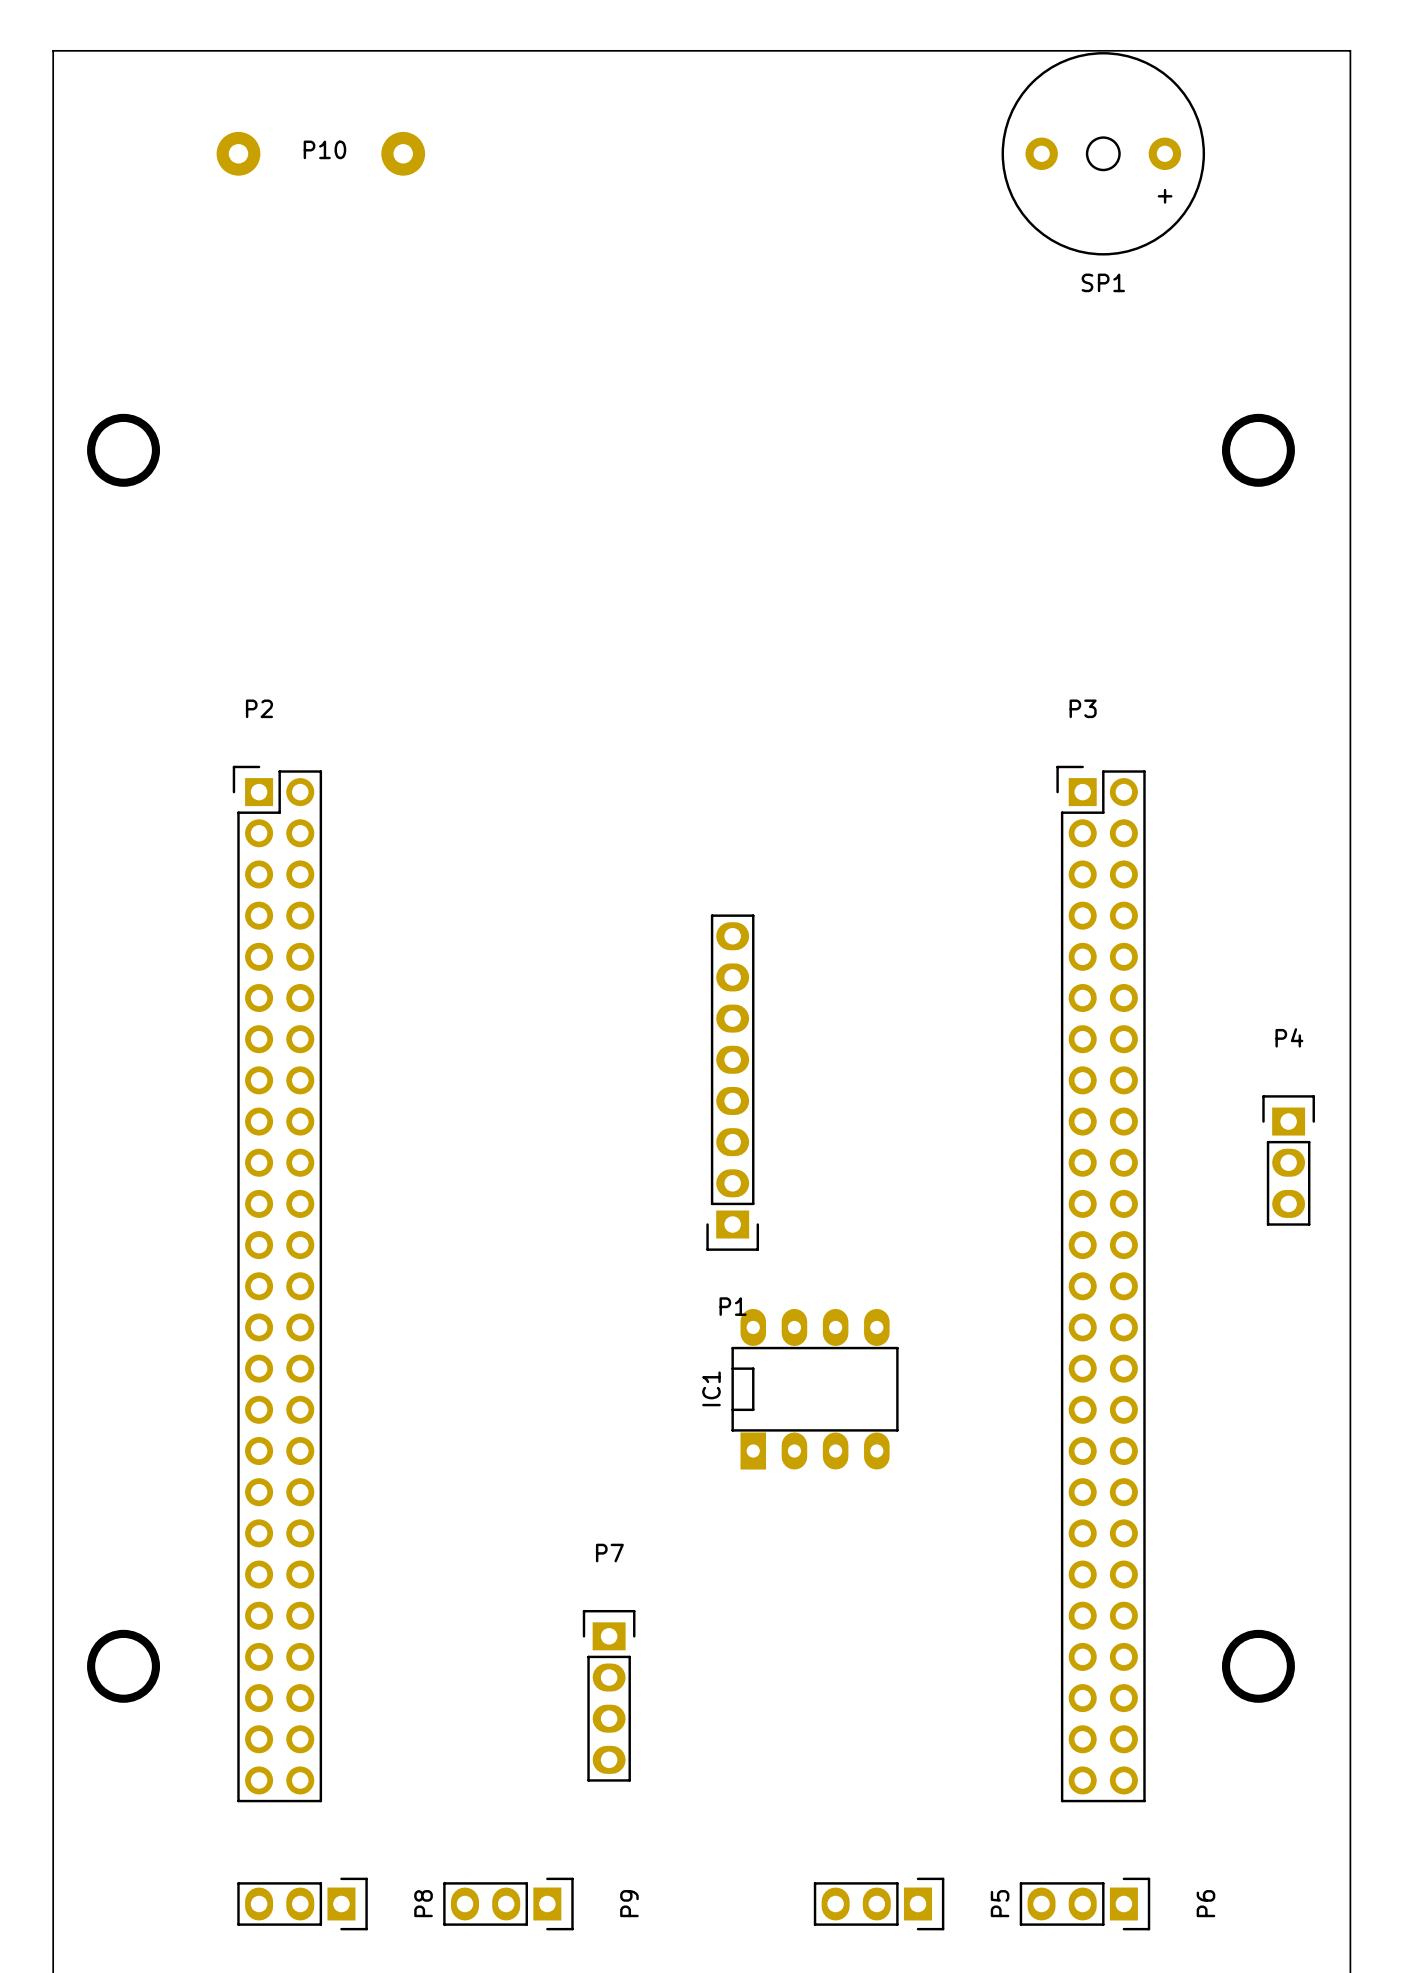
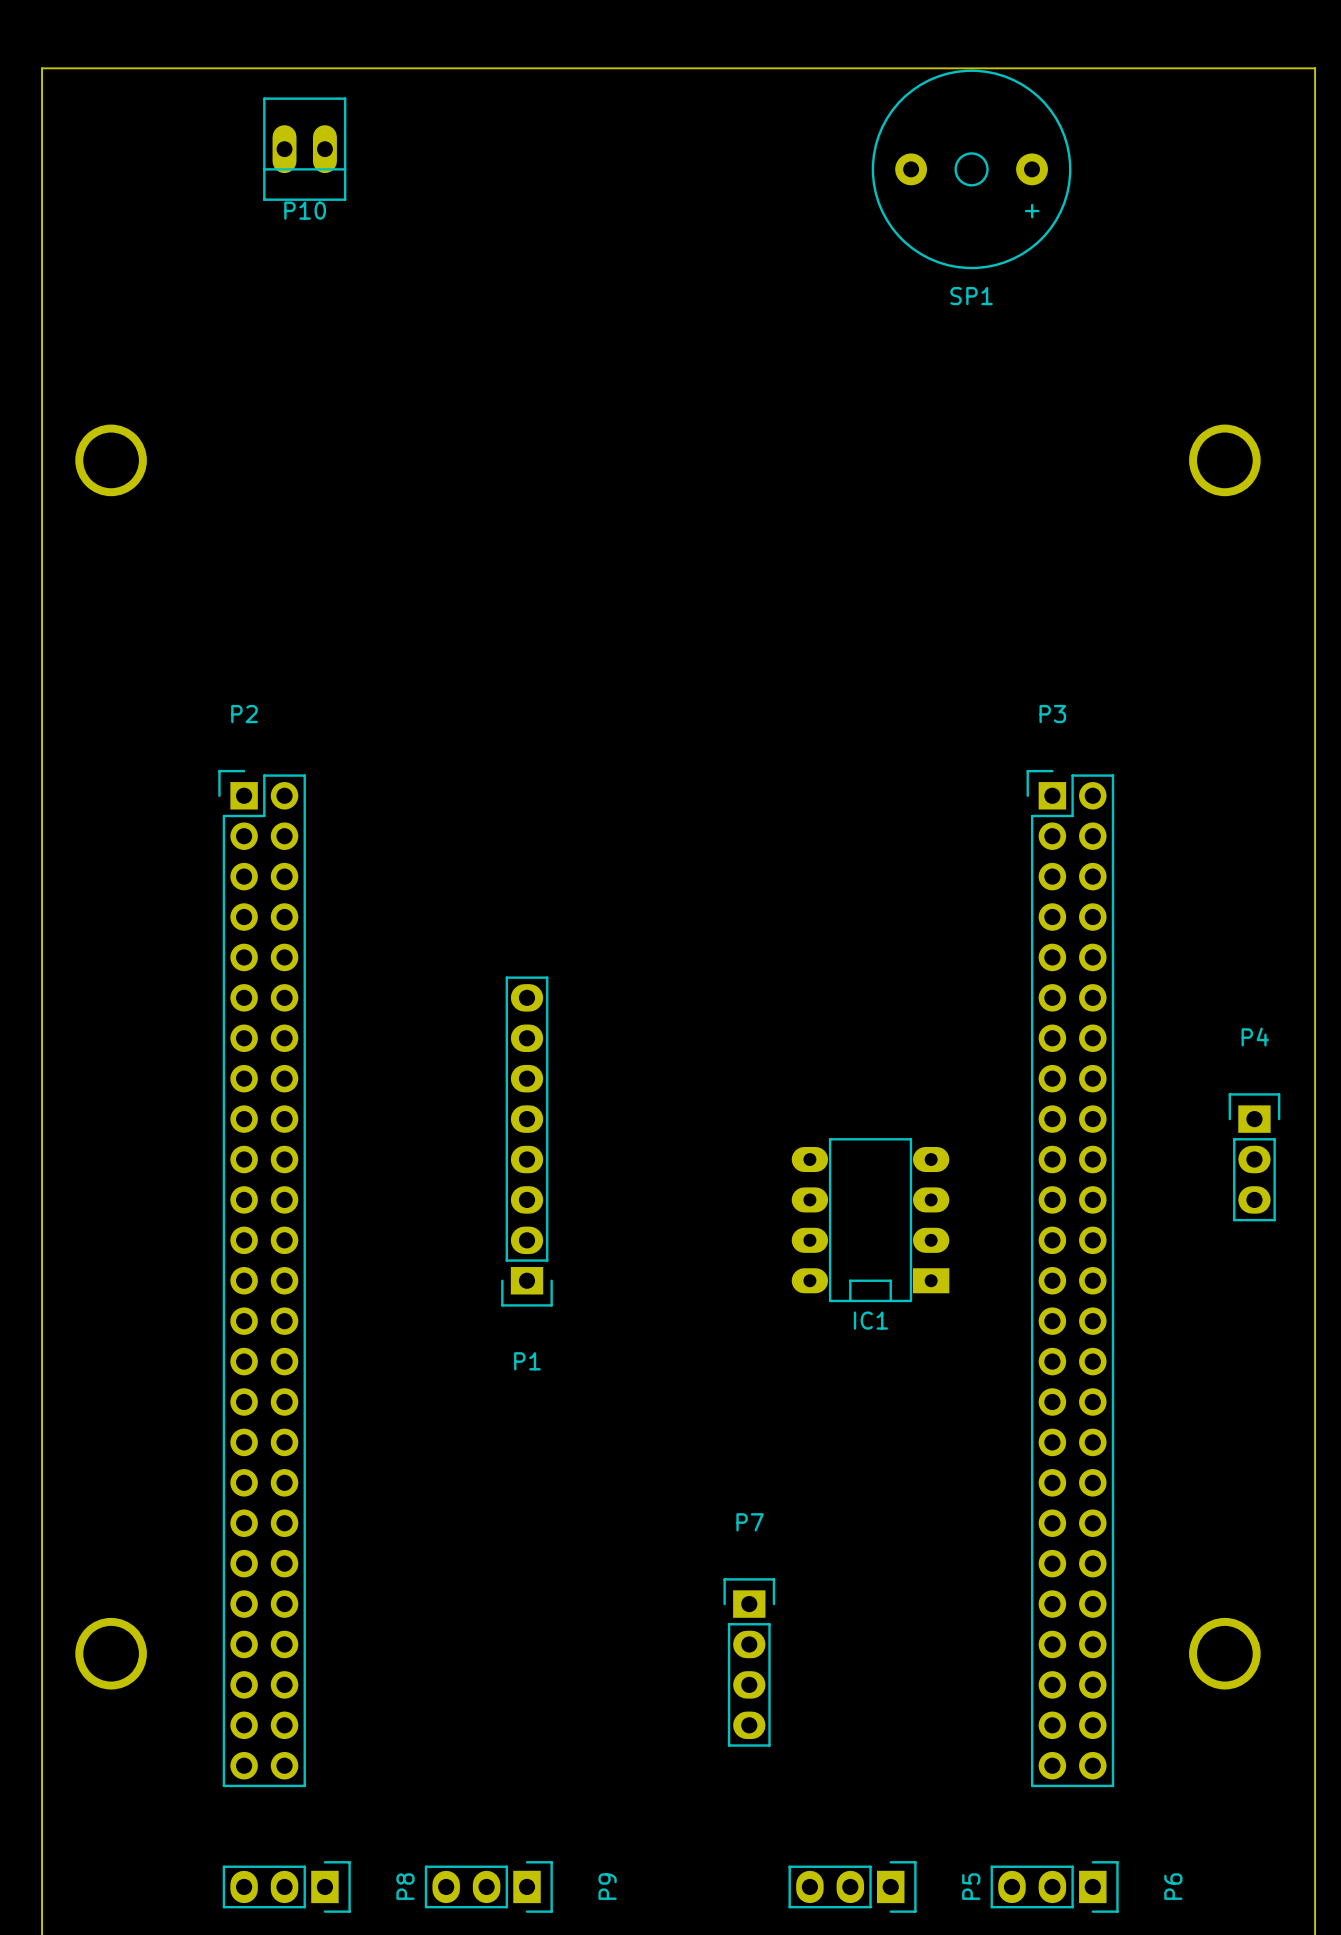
P10 footprint: [216, 131, 426, 176] -> [263, 97, 347, 201]
P10 name position: P10 (324, 149) -> P10 (305, 210)
SP1 position: (1103, 153) -> (971, 169)
P1 position: (732, 1082) -> (527, 1141)
IC1 rotation: 0° (815, 1389) -> 90° counterclockwise (870, 1220)
IC1 position: (815, 1389) -> (870, 1220)
P7 position: (609, 1695) -> (749, 1662)

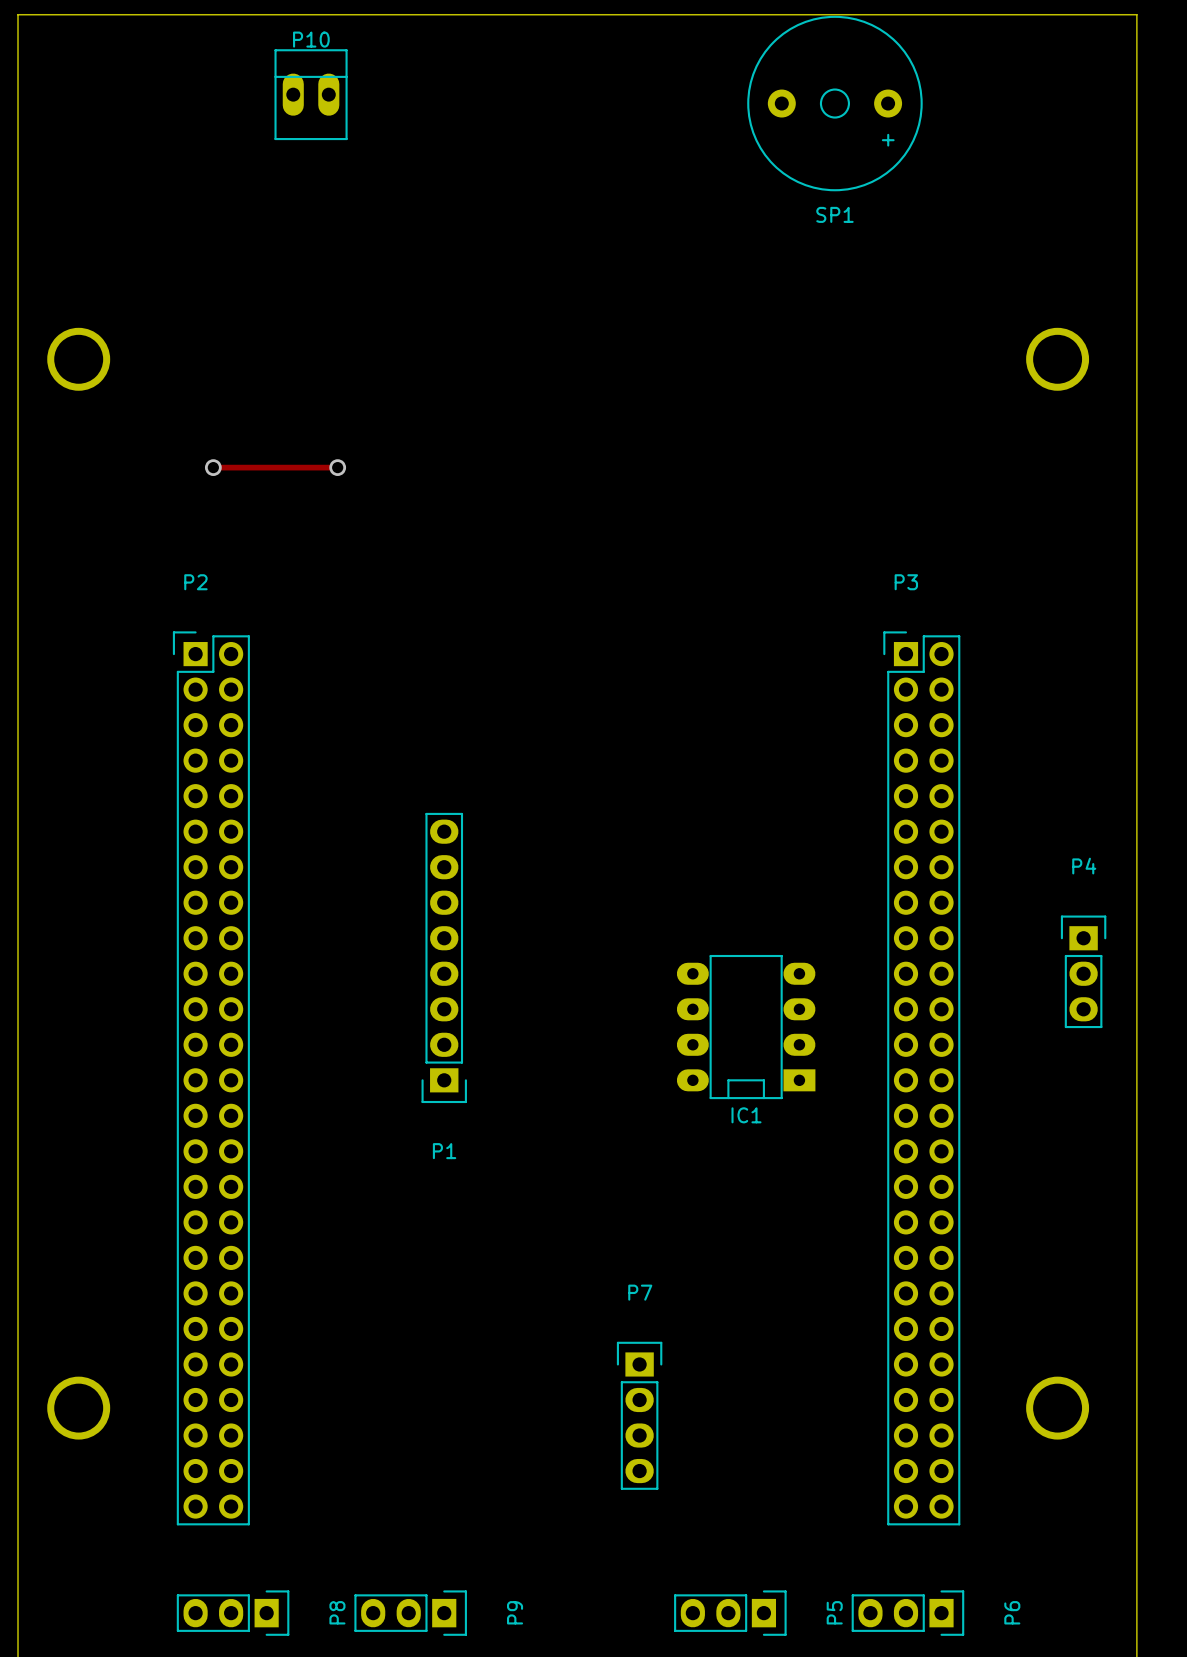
P10 rotation: 0° (304, 149) -> 180° (311, 94)
P10 position: (304, 149) -> (311, 94)
track: none -> (213, 467) (337, 467)
via: none -> (213, 467)
via: none -> (337, 467)

